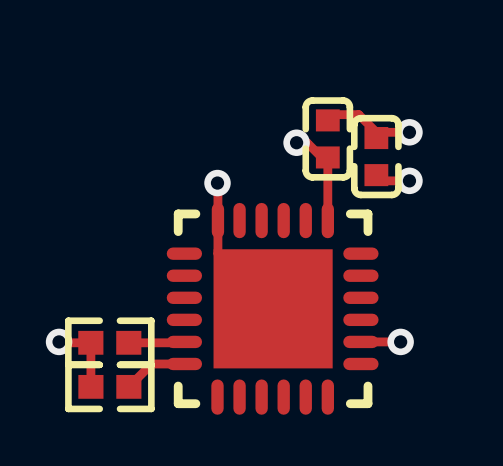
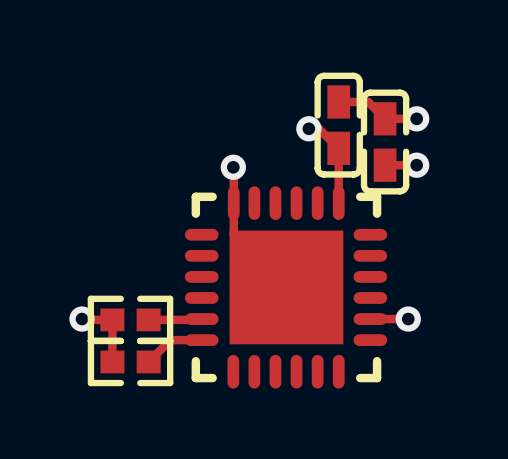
part footprint: [302, 97, 354, 181] -> [314, 72, 363, 178]
part footprint: [350, 114, 402, 199] -> [360, 89, 410, 195]

